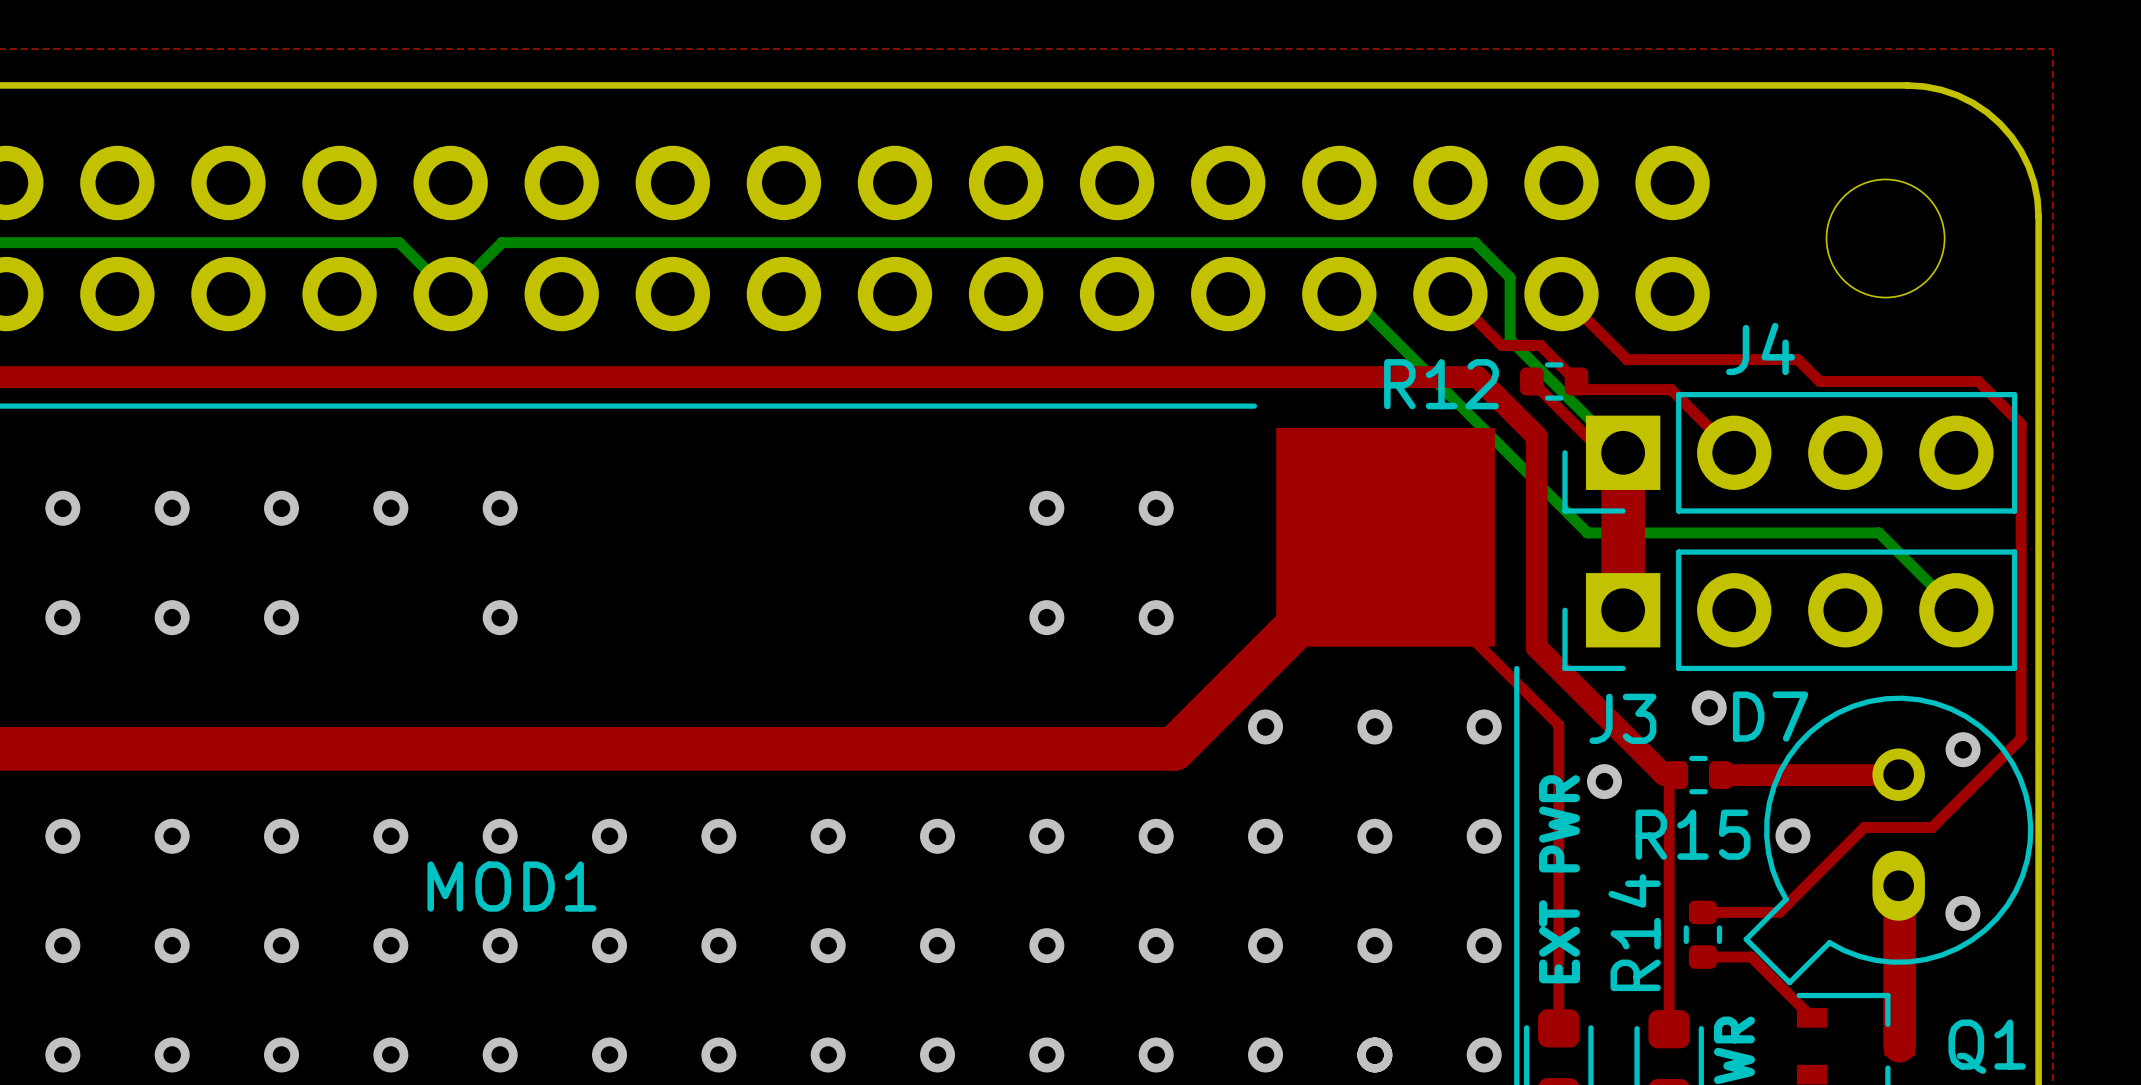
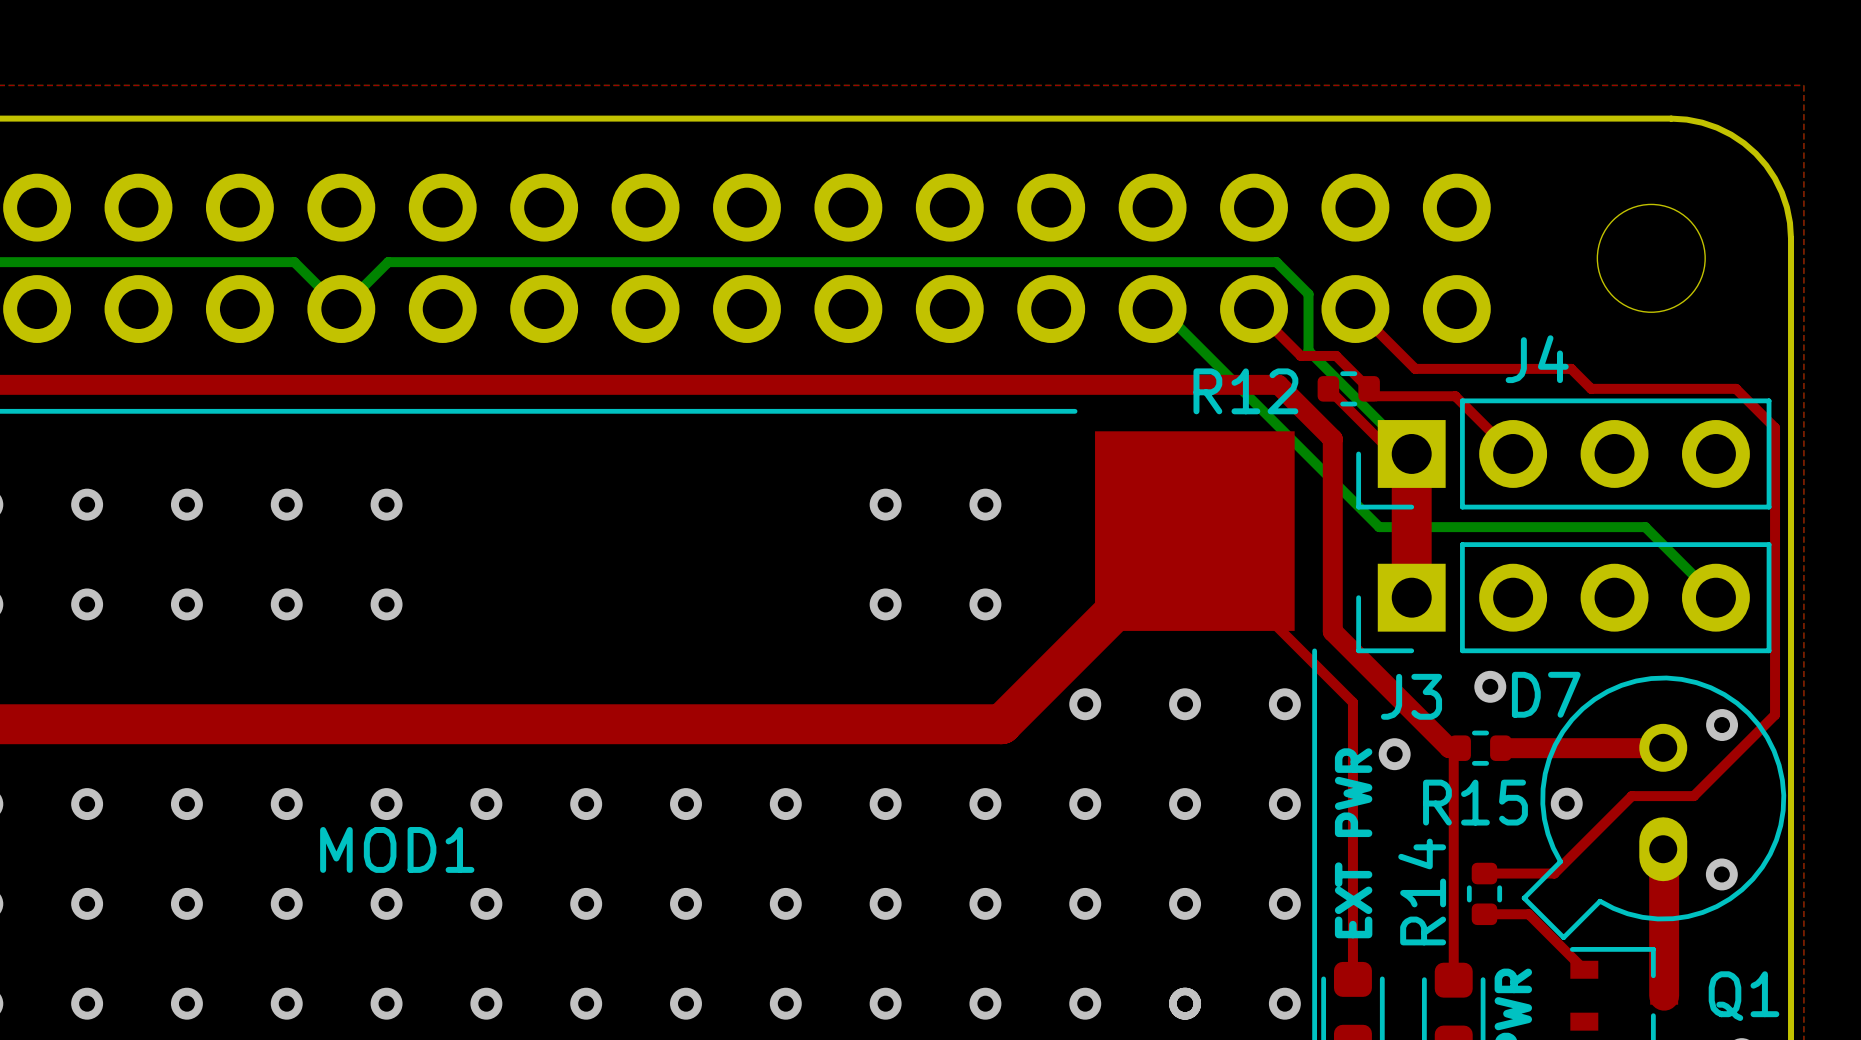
via: none -> (286, 604)

